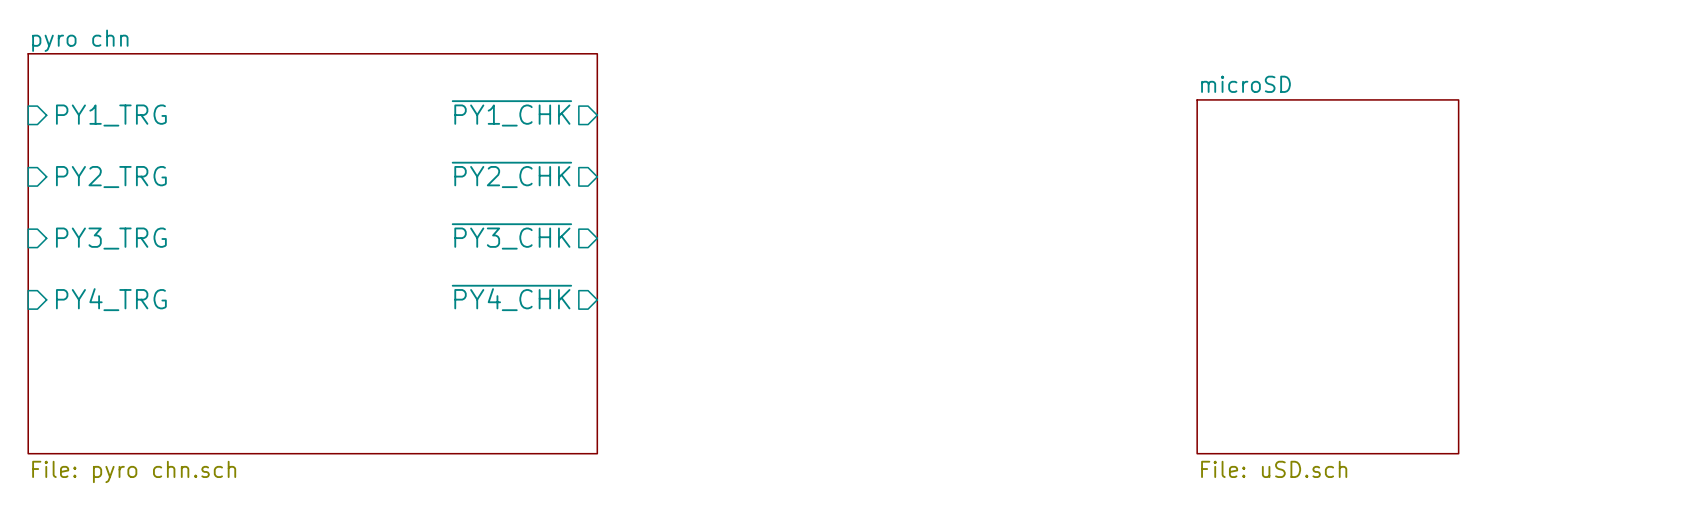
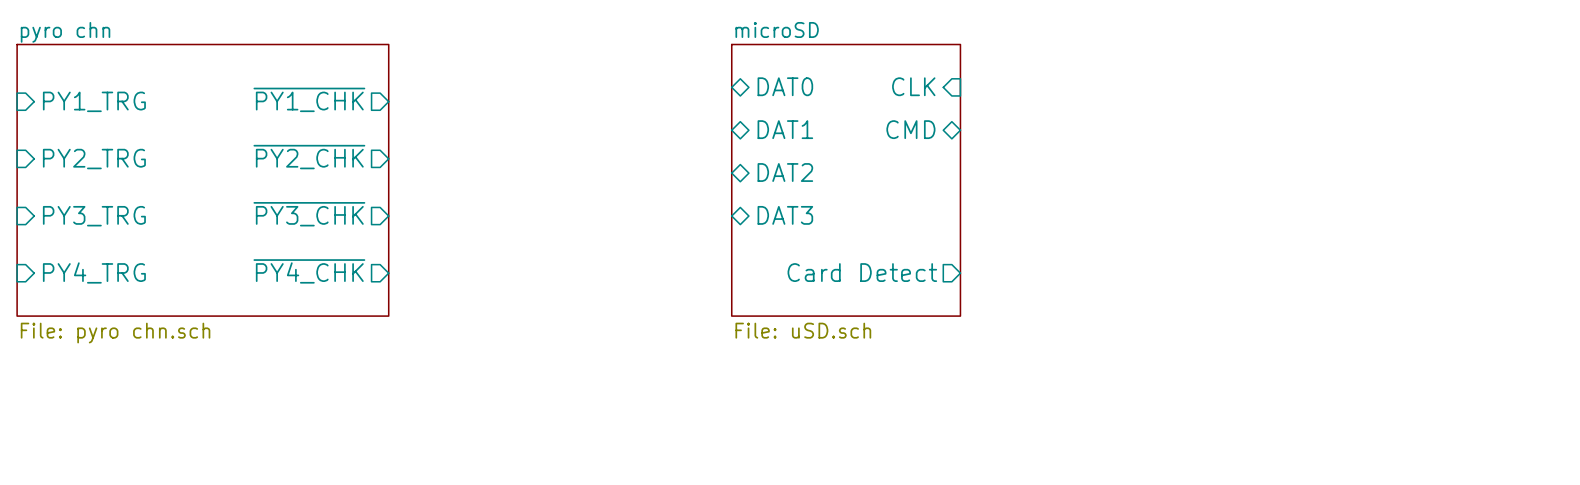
sheet pin: none -> DAT0 (785, 86)
sheet pin: none -> CLK (913, 86)
sheet pin position: ~{PY1_CHK} (511, 113) -> ~{PY1_CHK} (309, 99)
sheet pin: none -> DAT1 (785, 129)
sheet pin: none -> CMD (910, 129)
sheet pin position: ~{PY2_CHK} (511, 174) -> ~{PY2_CHK} (309, 157)
sheet pin: none -> DAT2 (785, 172)
sheet pyro chn: none -> File: pyro chn.sch (202, 180)
sheet microSD: none -> File: uSD.sch (846, 180)
sheet pin position: ~{PY3_CHK} (511, 236) -> ~{PY3_CHK} (309, 214)
sheet pin: none -> DAT3 (785, 215)
sheet pyro chn: File: pyro chn.sch (312, 253) -> none
sheet microSD: File: uSD.sch (1327, 276) -> none
sheet pin position: ~{PY4_CHK} (511, 297) -> ~{PY4_CHK} (309, 271)
sheet pin: none -> Card Detect (862, 272)

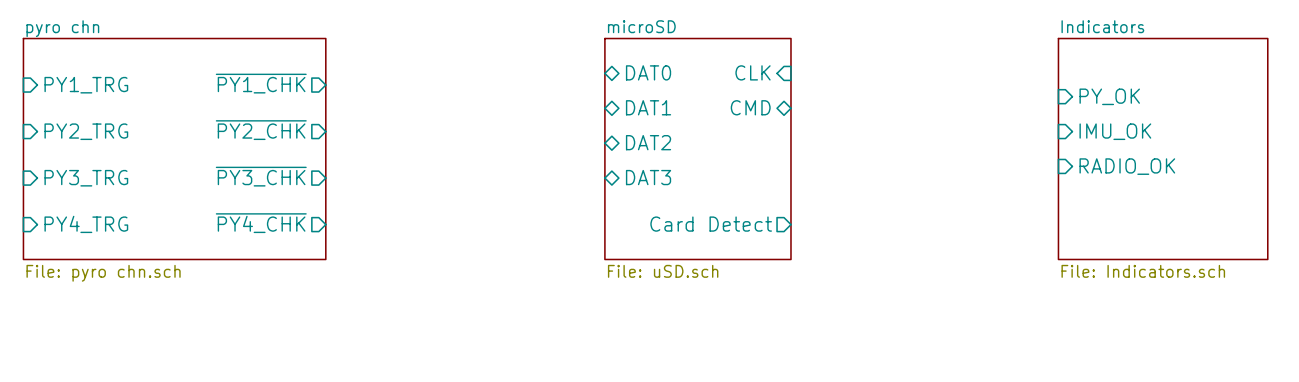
sheet pin: none -> PY_OK (1109, 96)
sheet pin: none -> IMU_OK (1115, 131)
sheet Indicators: none -> File: Indicators.sch (1163, 149)
sheet pin: none -> RADIO_OK (1127, 166)

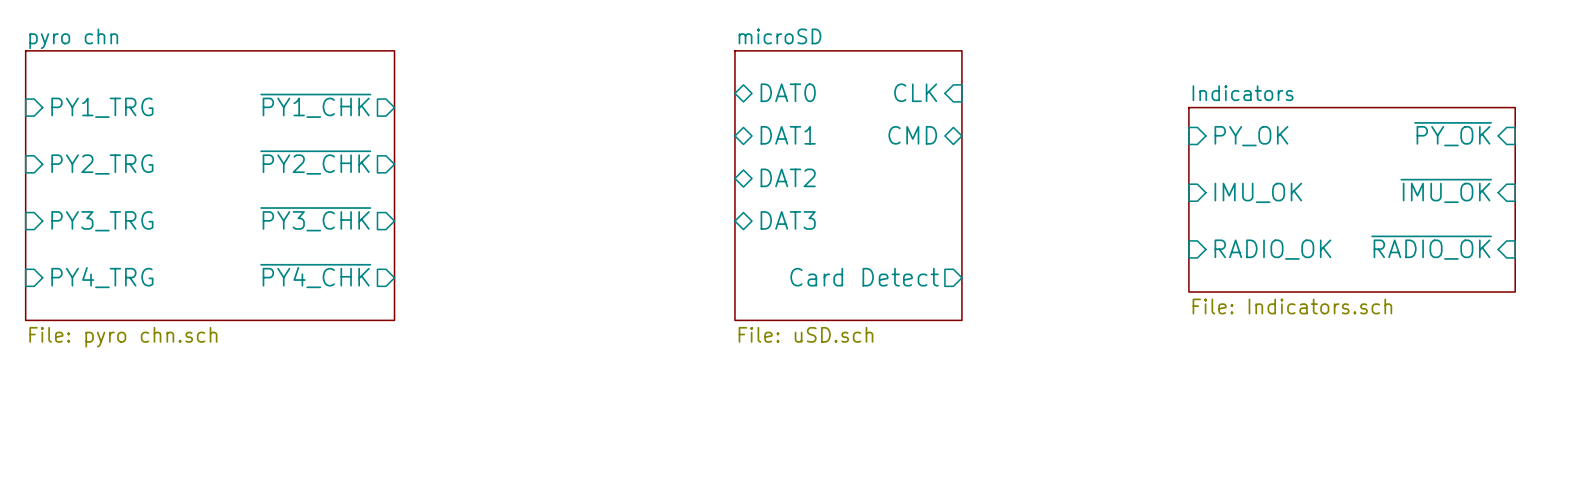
sheet pin position: PY_OK (1109, 96) -> PY_OK (1251, 136)
sheet pin: none -> ~{PY_OK} (1453, 134)
sheet pin position: IMU_OK (1115, 131) -> IMU_OK (1258, 192)
sheet Indicators: File: Indicators.sch (1163, 149) -> none
sheet pin: none -> ~{IMU_OK} (1446, 190)
sheet Indicators: none -> File: Indicators.sch (1352, 199)
sheet pin position: RADIO_OK (1127, 166) -> RADIO_OK (1272, 249)
sheet pin: none -> ~{RADIO_OK} (1431, 247)

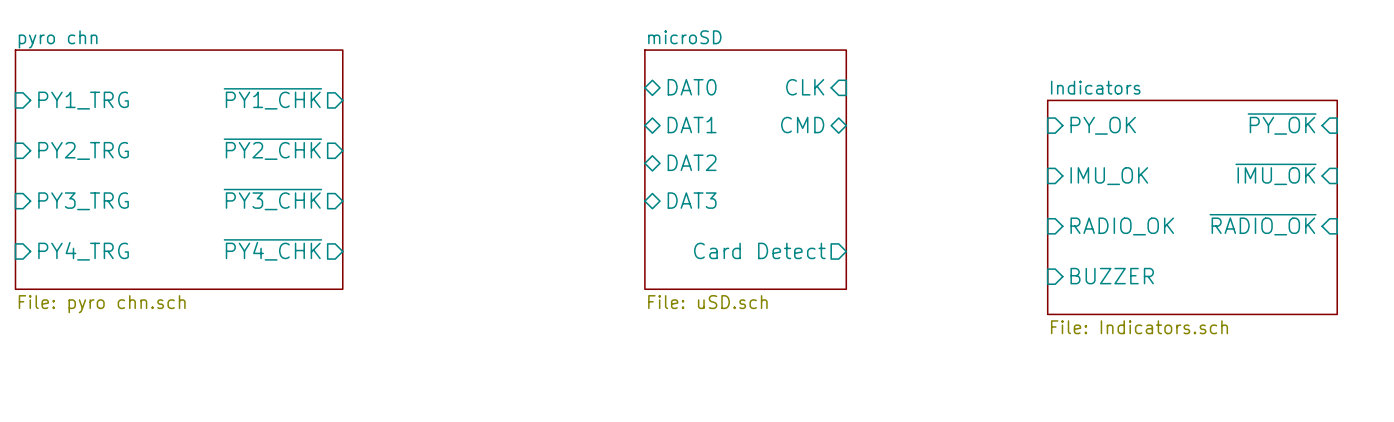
sheet Indicators: File: Indicators.sch (1352, 199) -> none
sheet Indicators: none -> File: Indicators.sch (1192, 207)
sheet pin: none -> BUZZER (1112, 276)

